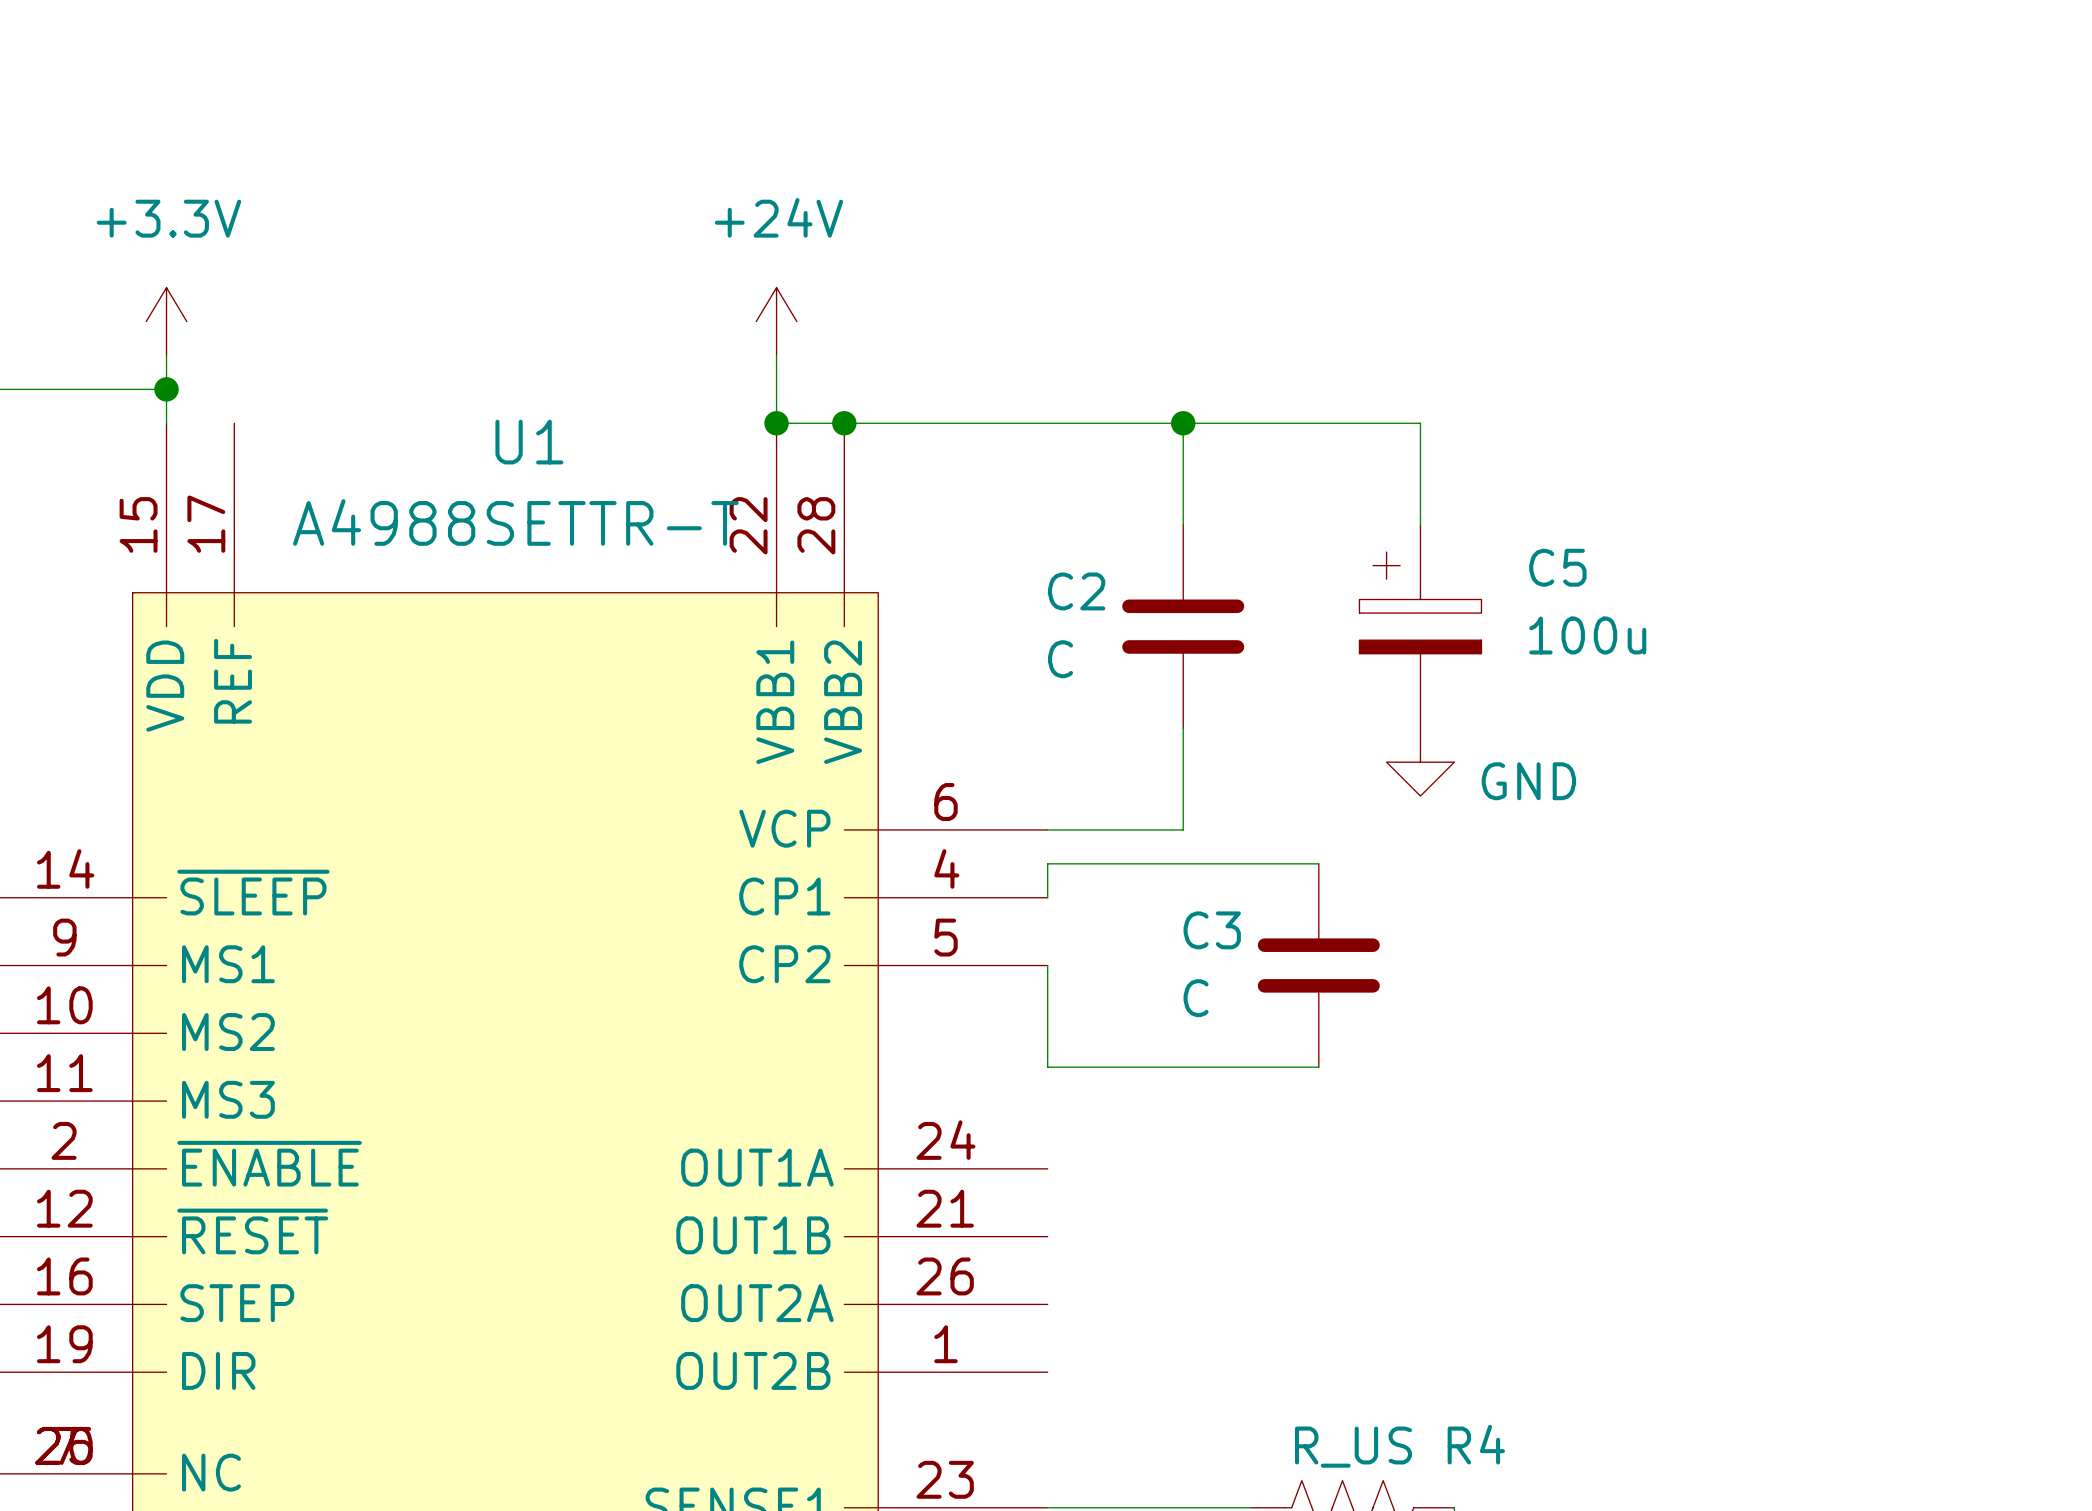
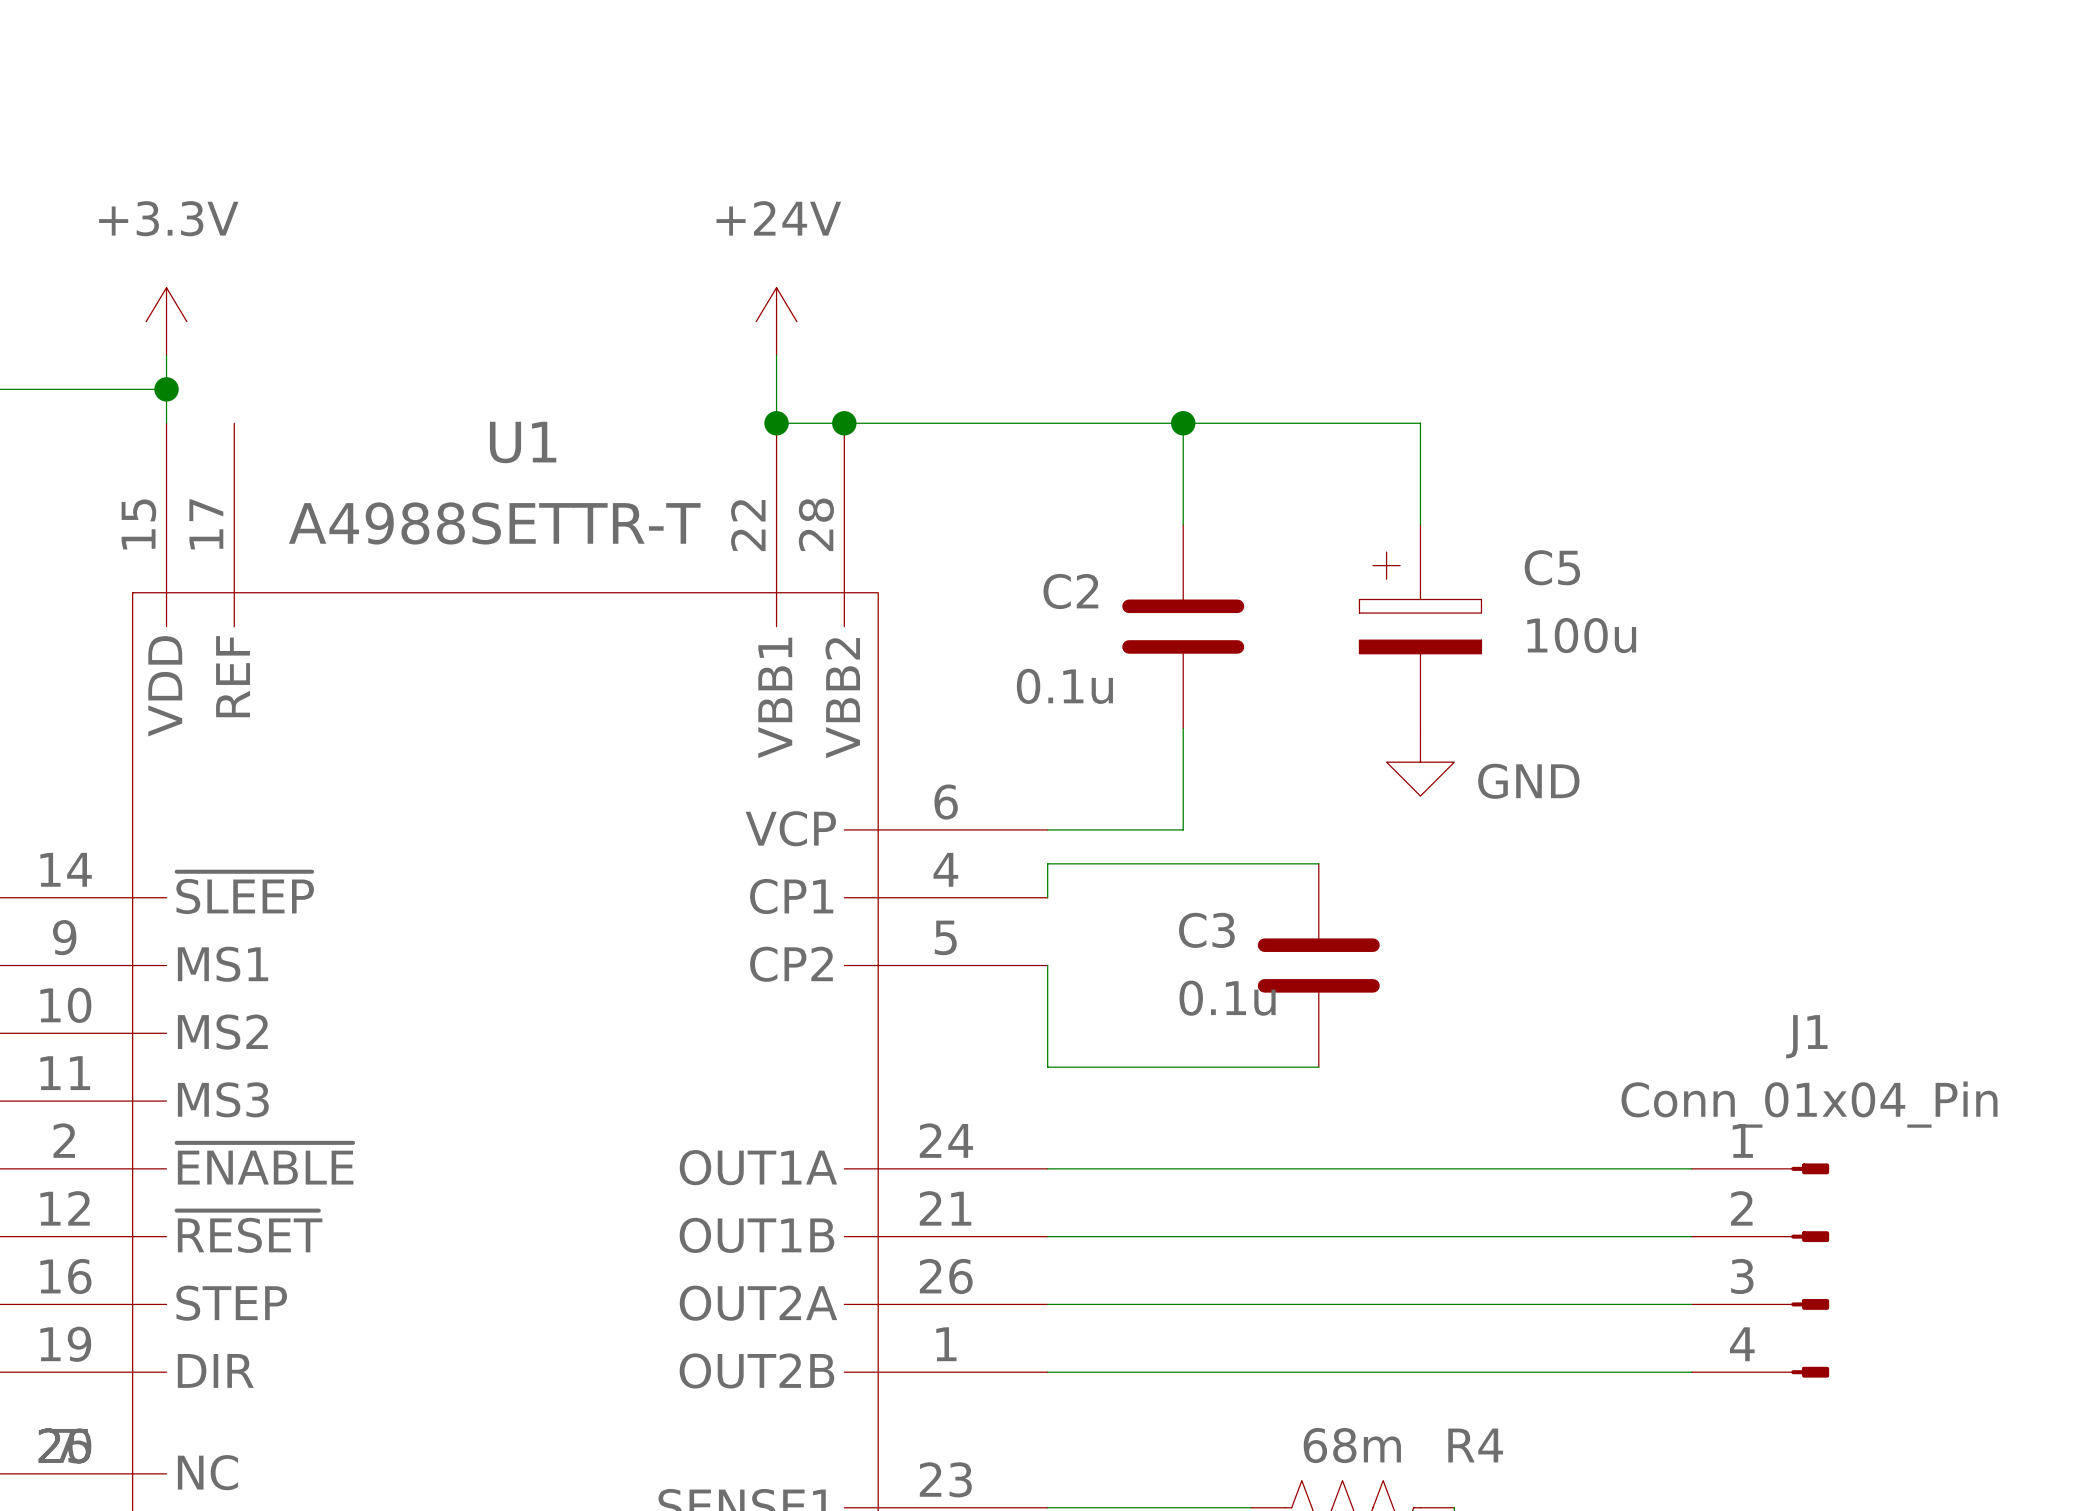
C2 value: C (1060, 659) -> 0.1u (1064, 686)
C3 value: C (1196, 998) -> 0.1u (1227, 998)
wire: none -> (1047, 1168) (1691, 1168)
wire: none -> (1047, 1236) (1691, 1236)
J1: none -> Conn_01x04_Pin (1760, 1270)
wire: none -> (1047, 1304) (1691, 1304)
wire: none -> (1047, 1372) (1691, 1372)
R4 value: R_US (1353, 1447) -> 68m (1352, 1445)

